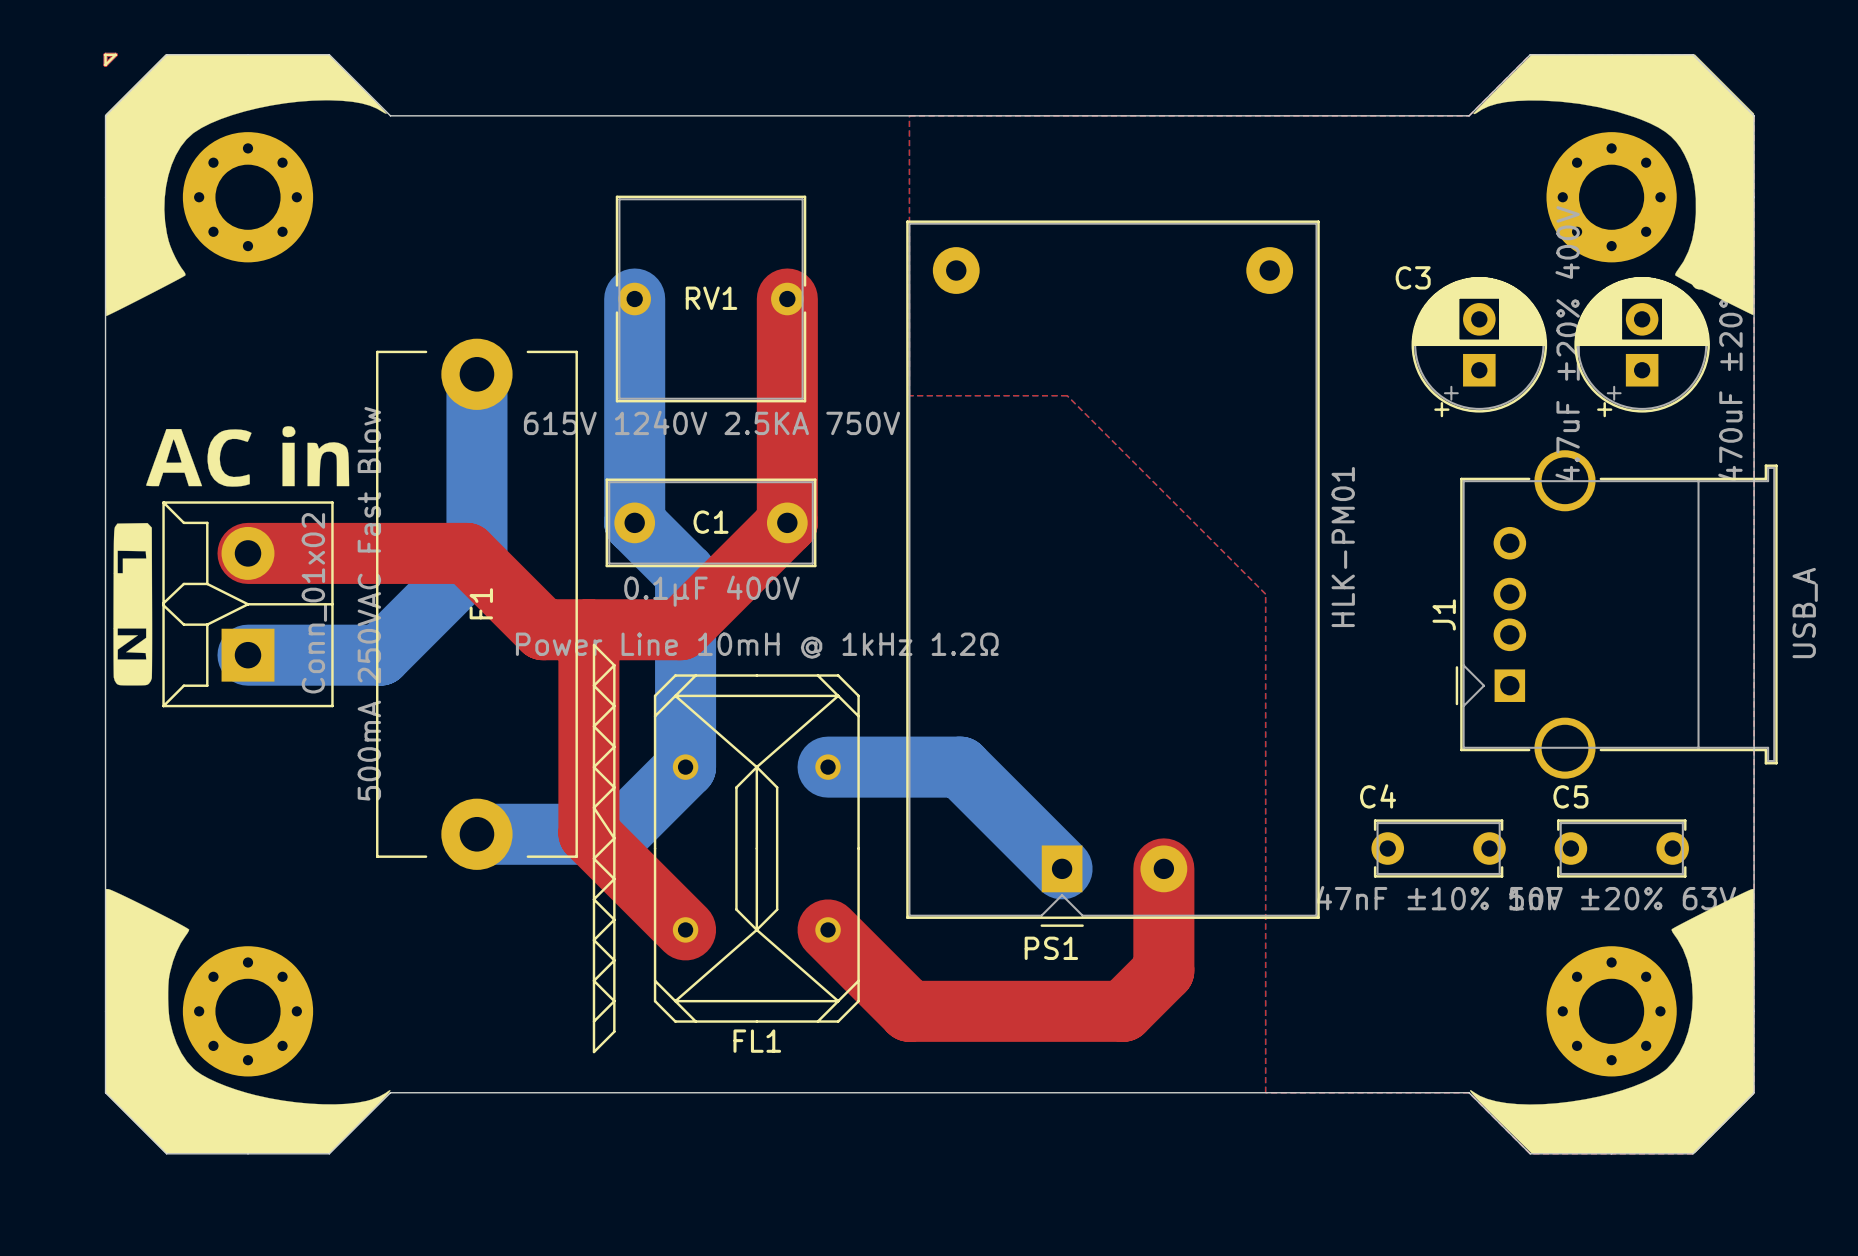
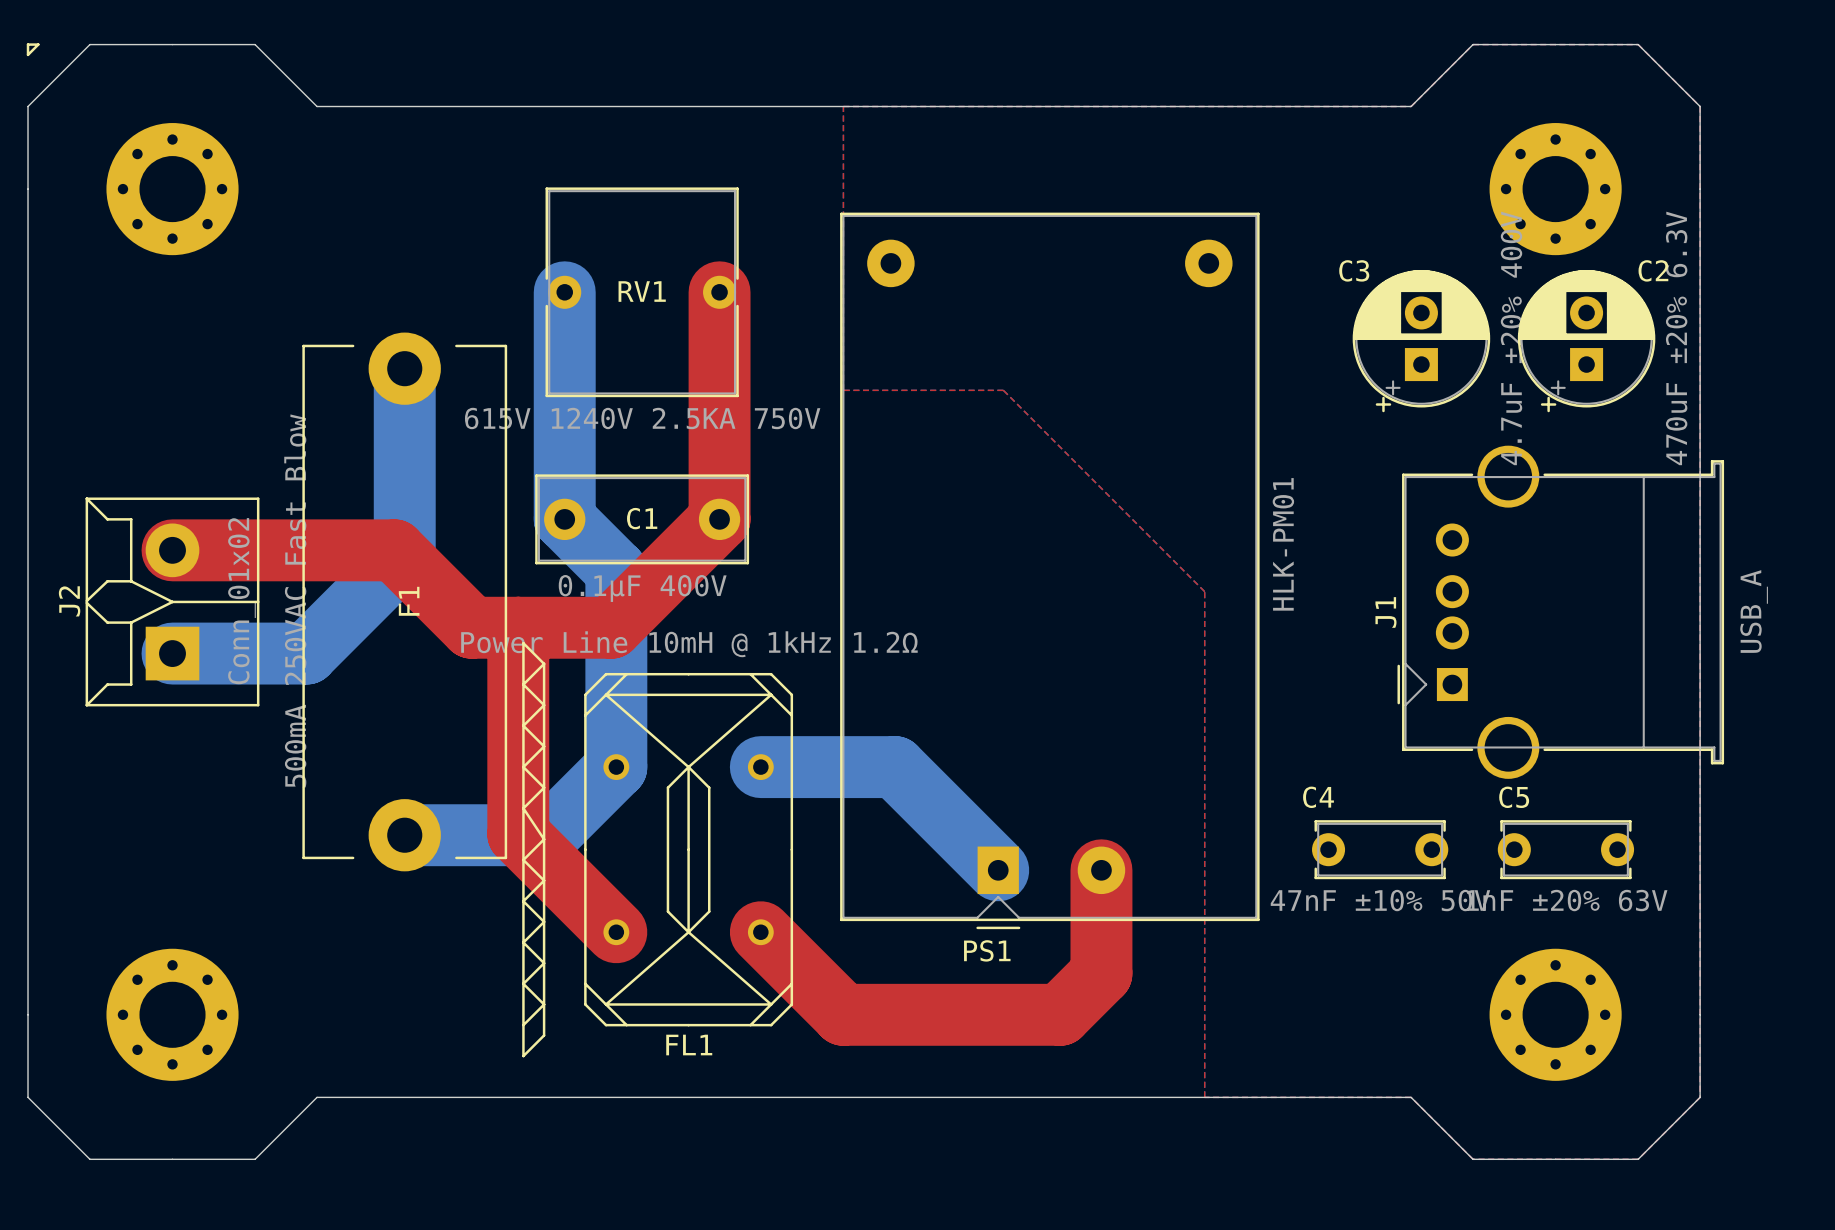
top track: (105, 54) (105, 64) (115, 54) (105, 54) -> none
drawing: [105, 54, 1755, 1154] -> none
J2 name: none -> J2 (69, 601)

